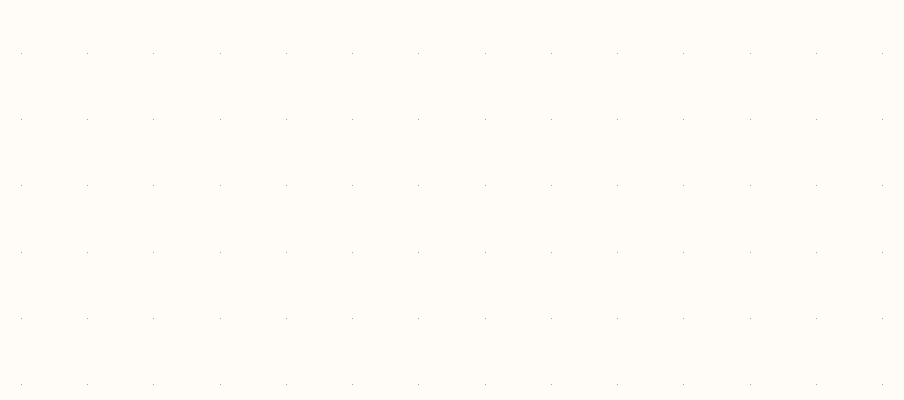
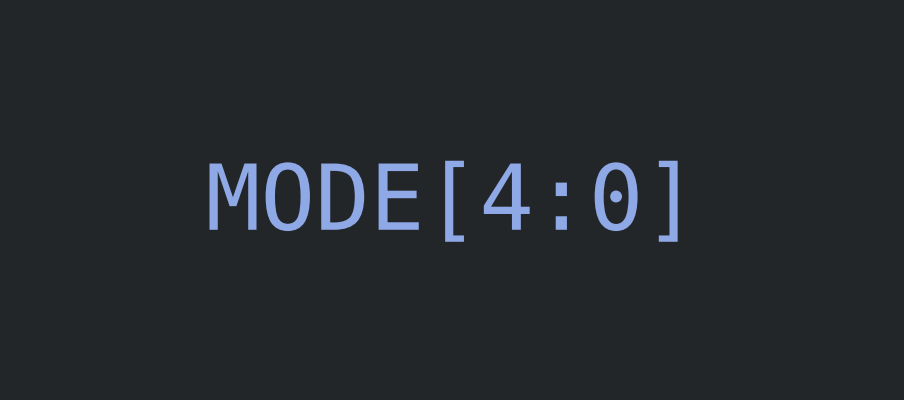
text: none -> MODE[4:0] (443, 201)

